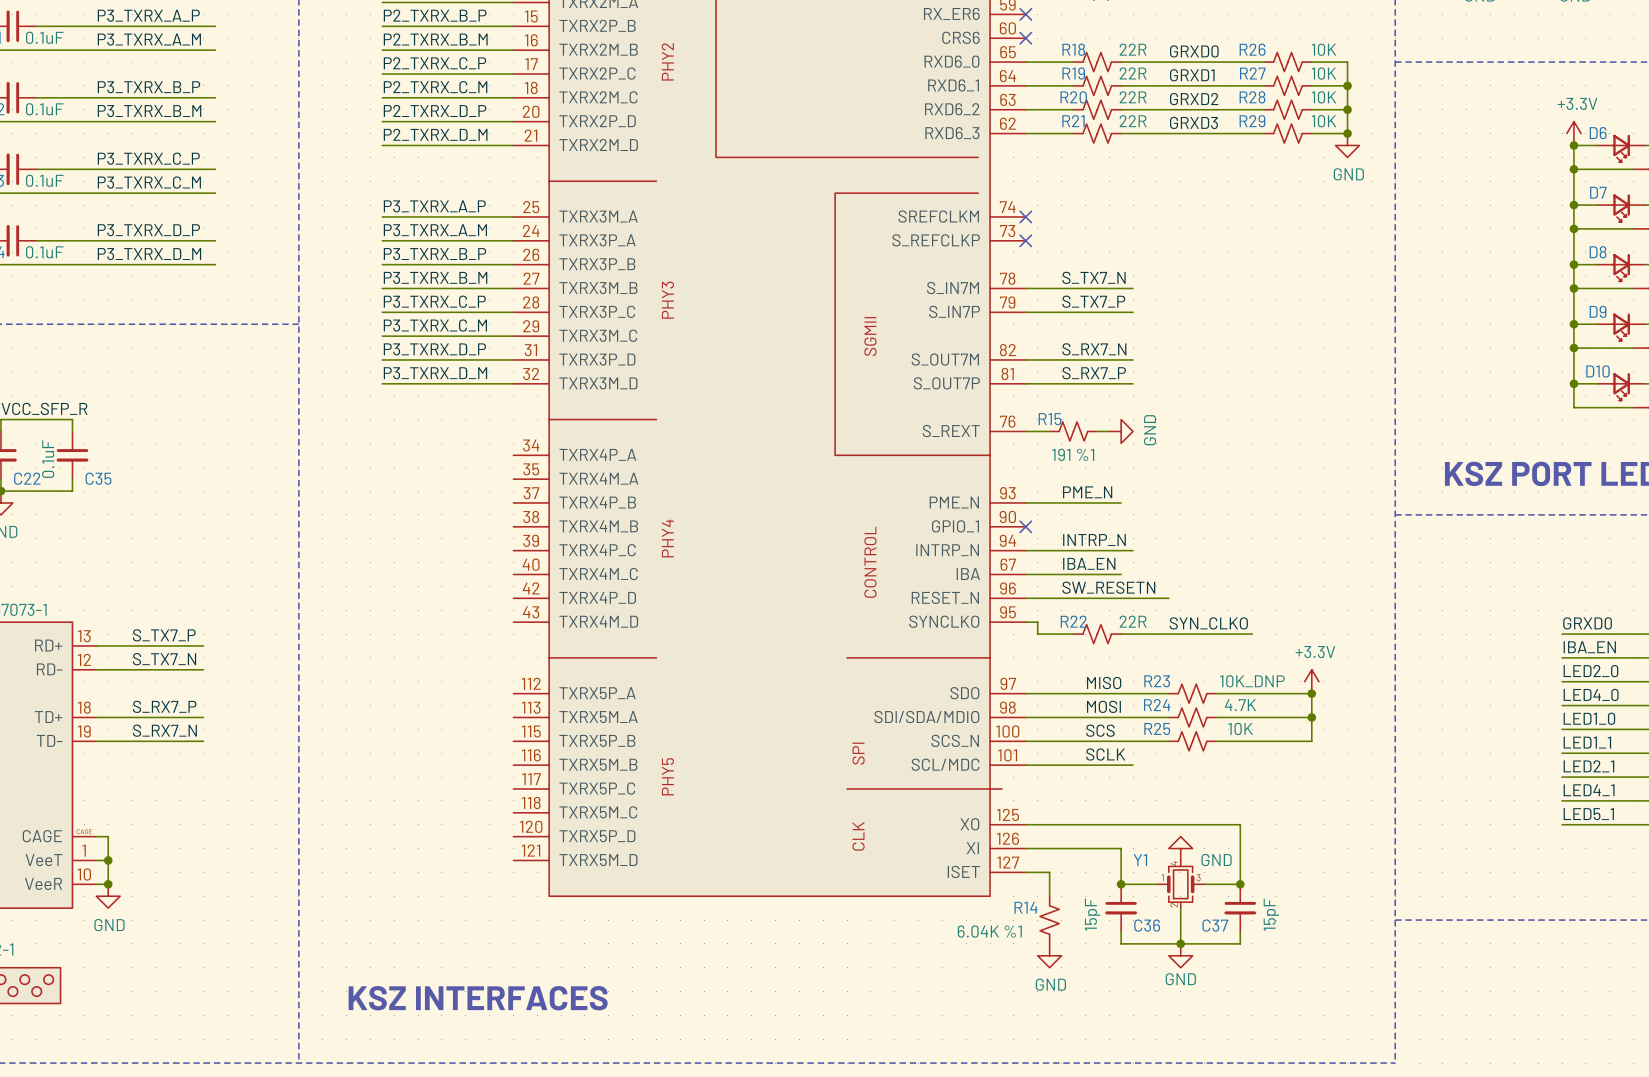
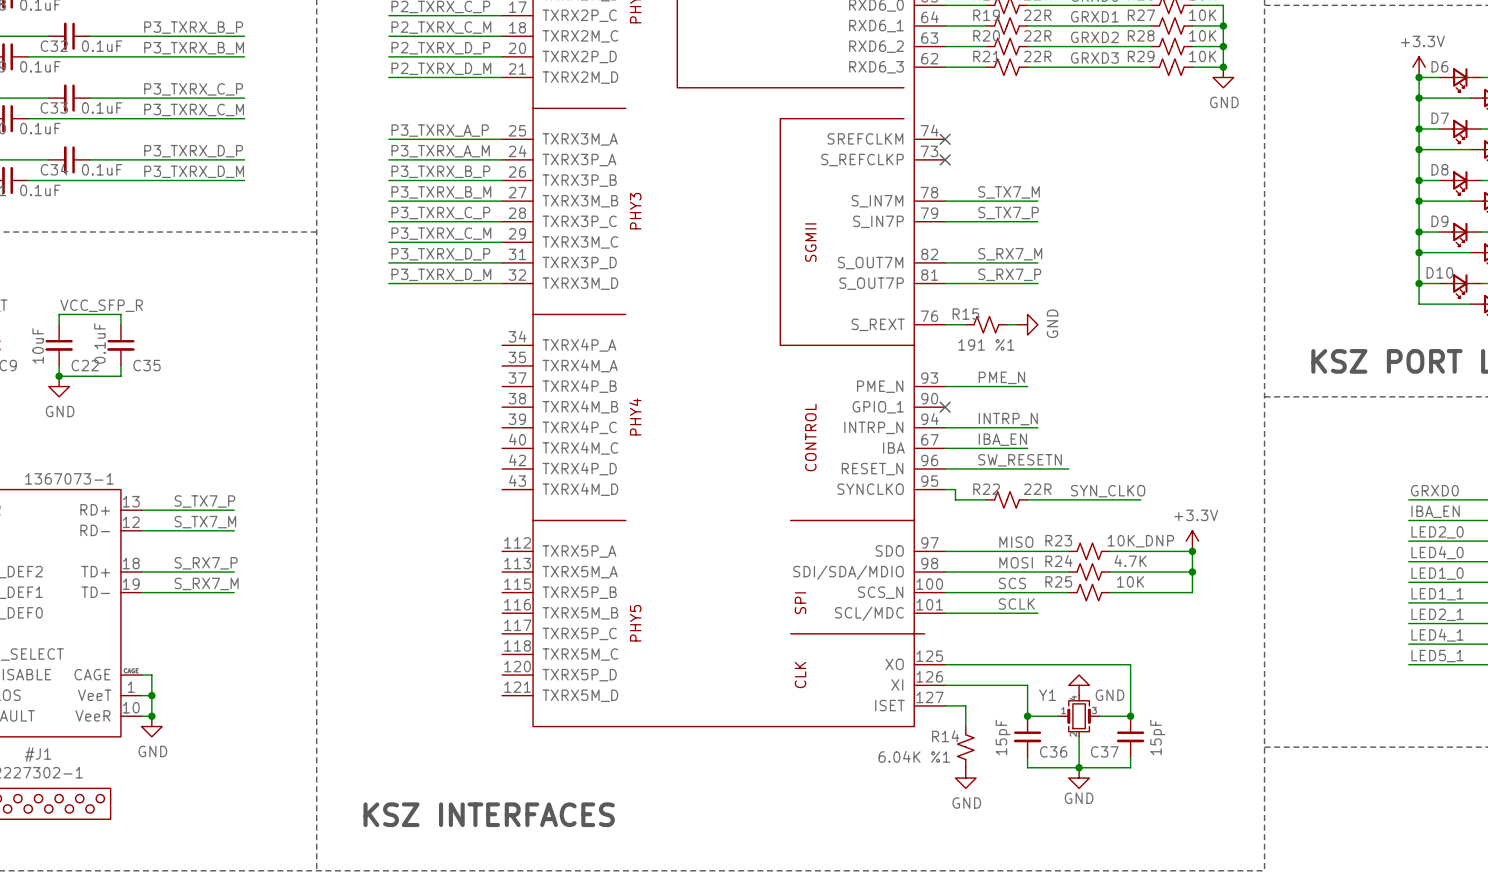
label: S_TX7_N (1094, 277) -> S_TX7_M (1009, 192)
label: S_RX7_N (1094, 349) -> S_RX7_M (1010, 254)
label: S_TX7_N (164, 659) -> S_TX7_M (205, 522)
label: S_RX7_N (164, 730) -> S_RX7_M (206, 583)

